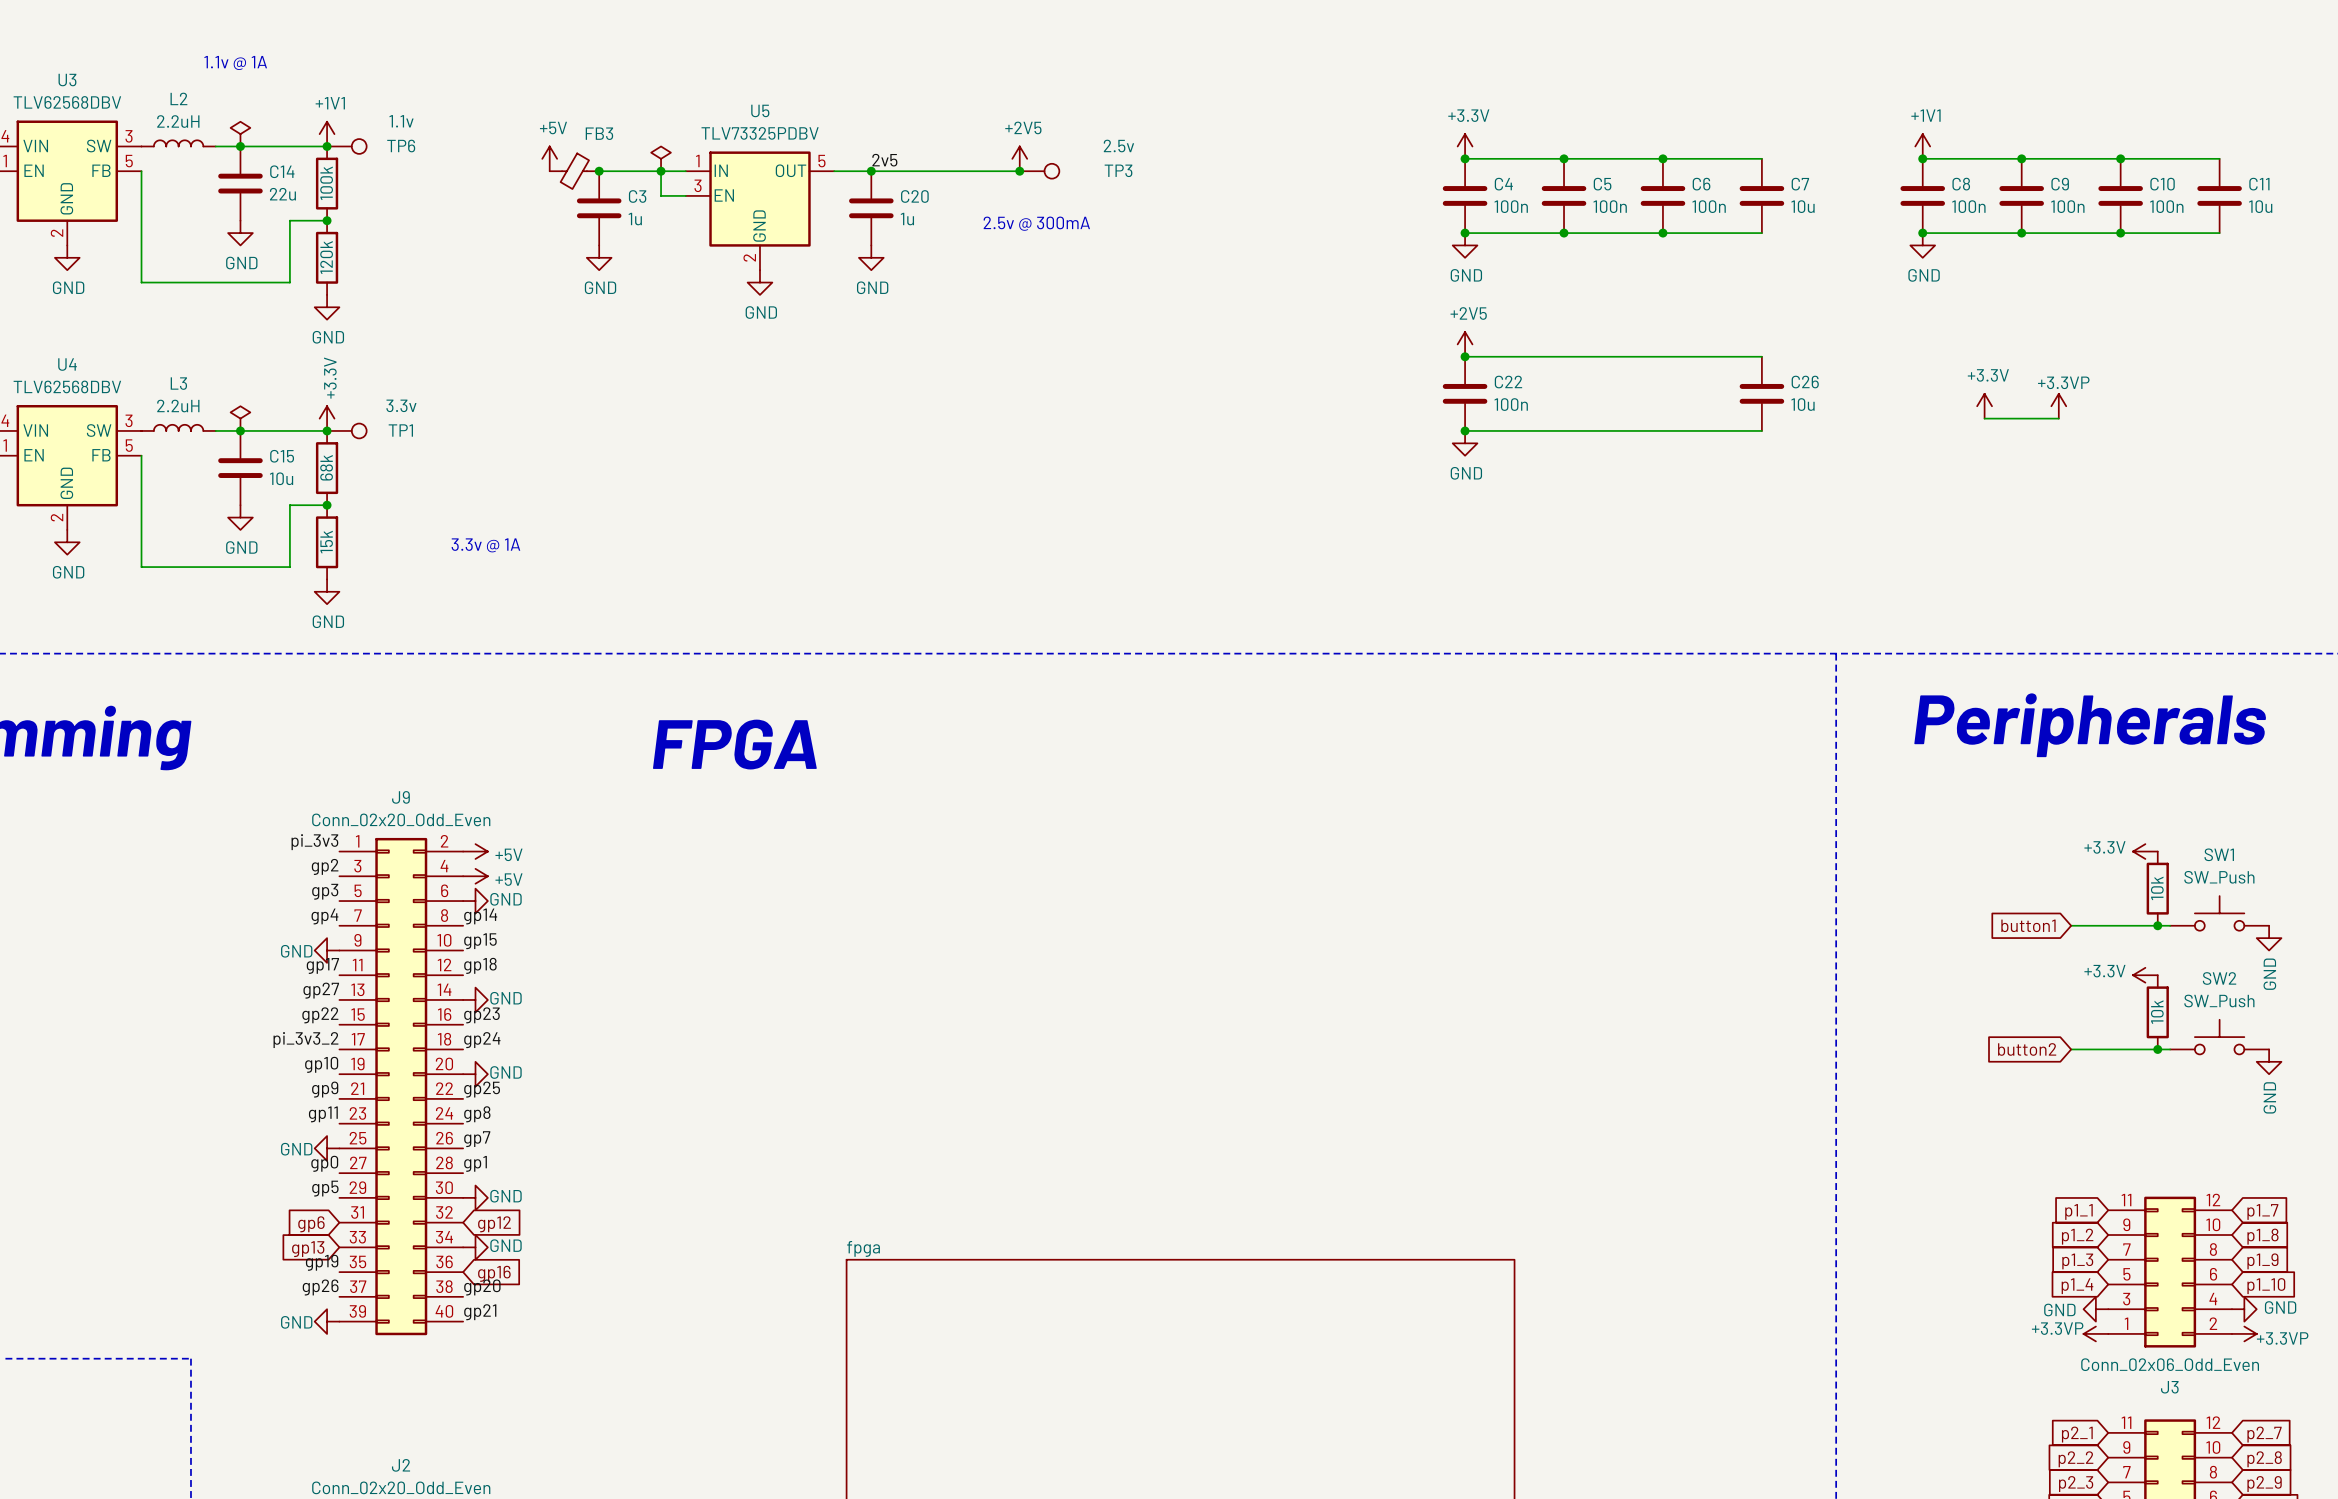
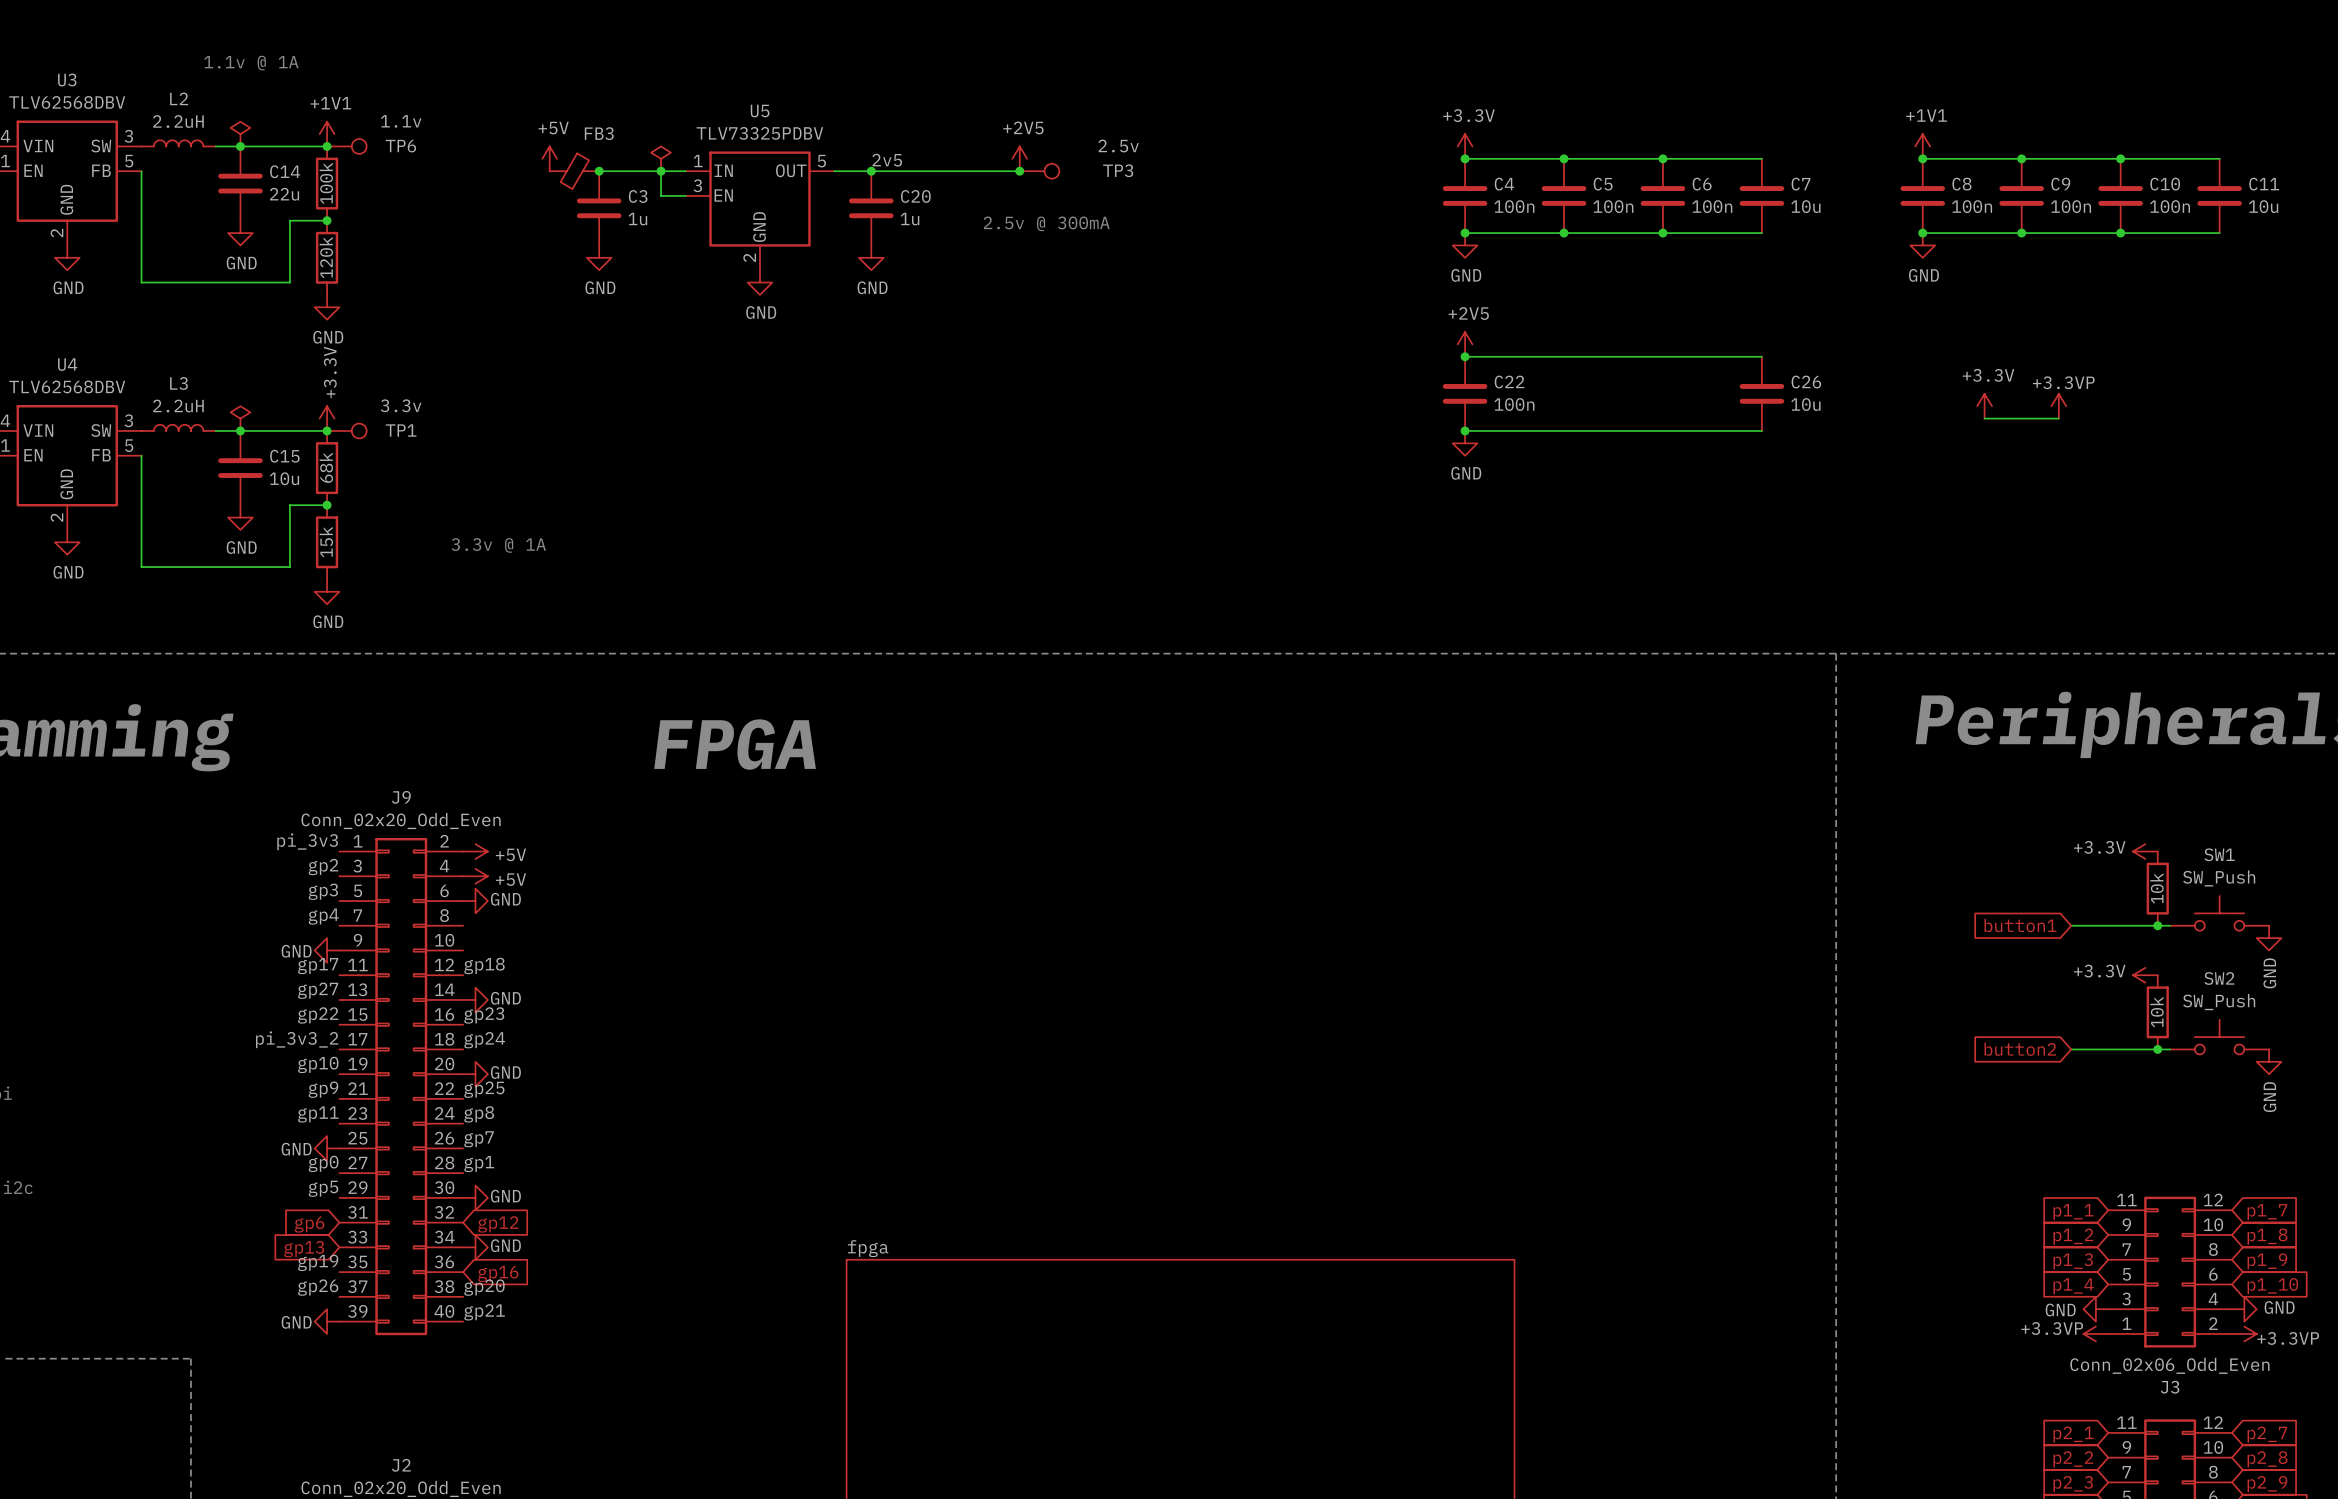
label: gp14 (480, 916) -> none
label: gp15 (480, 941) -> none

